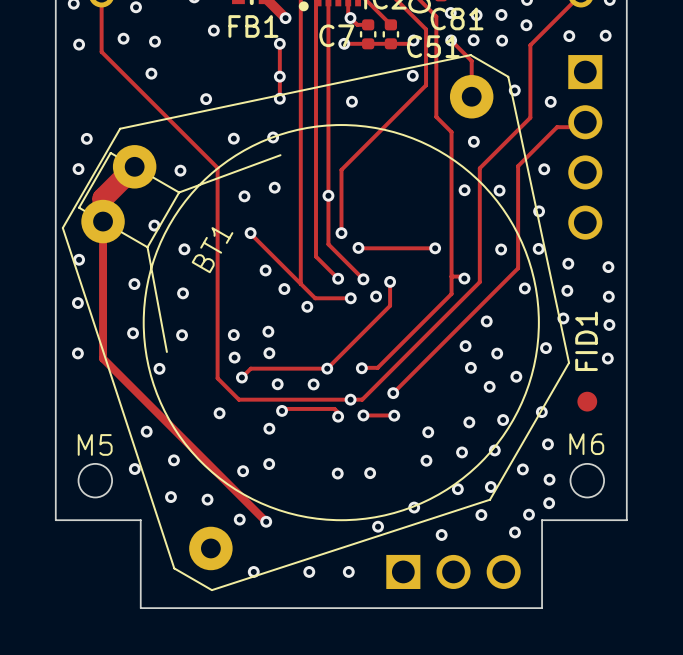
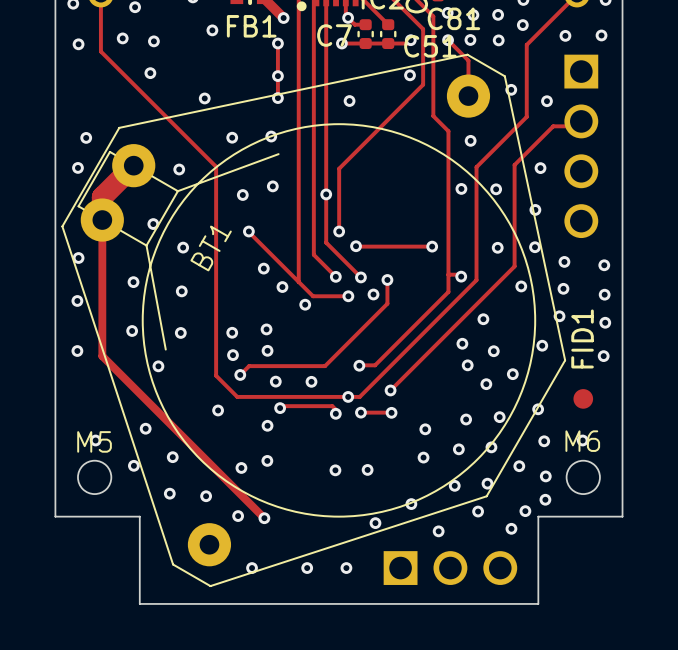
via: (327, 368) -> none
via: none -> (95, 440)
via: none -> (582, 440)

